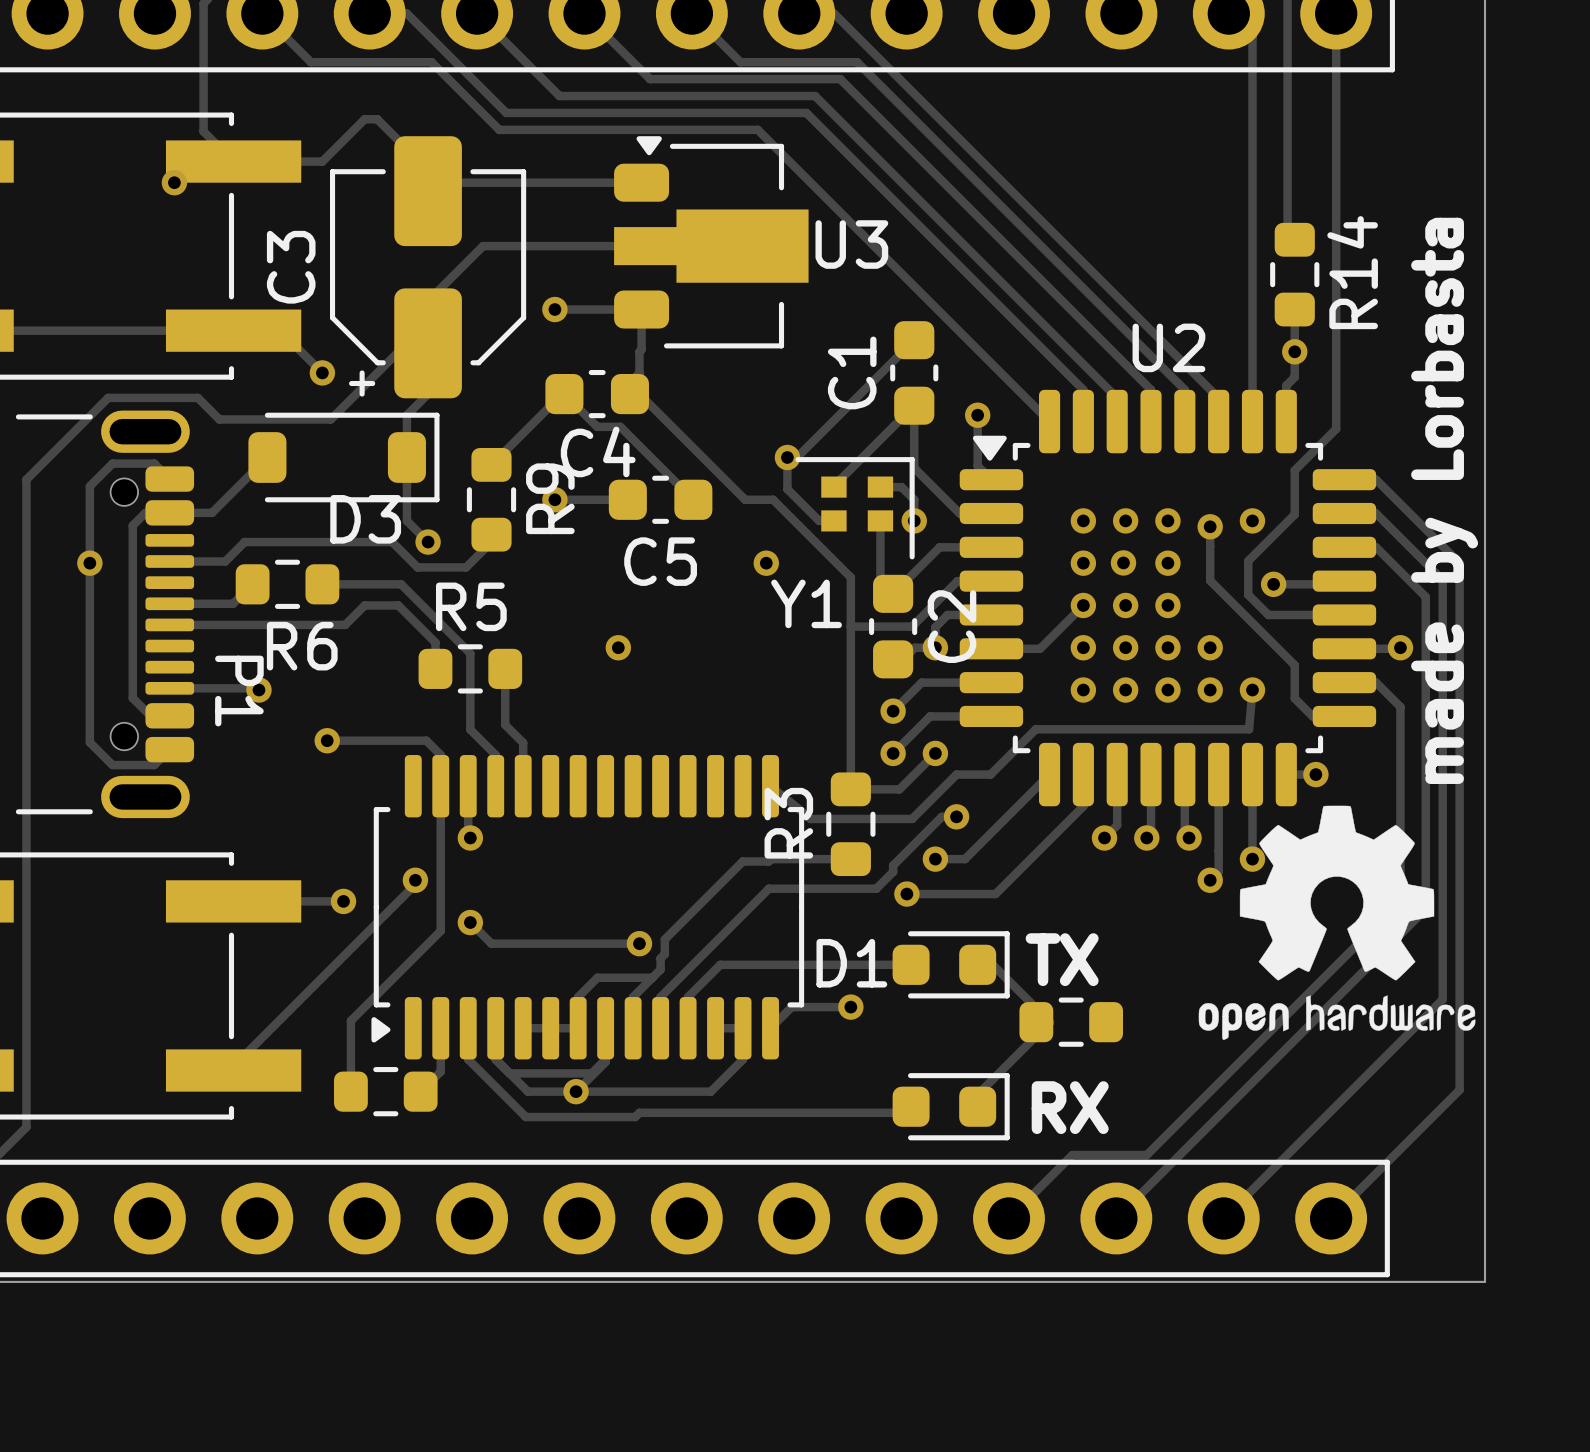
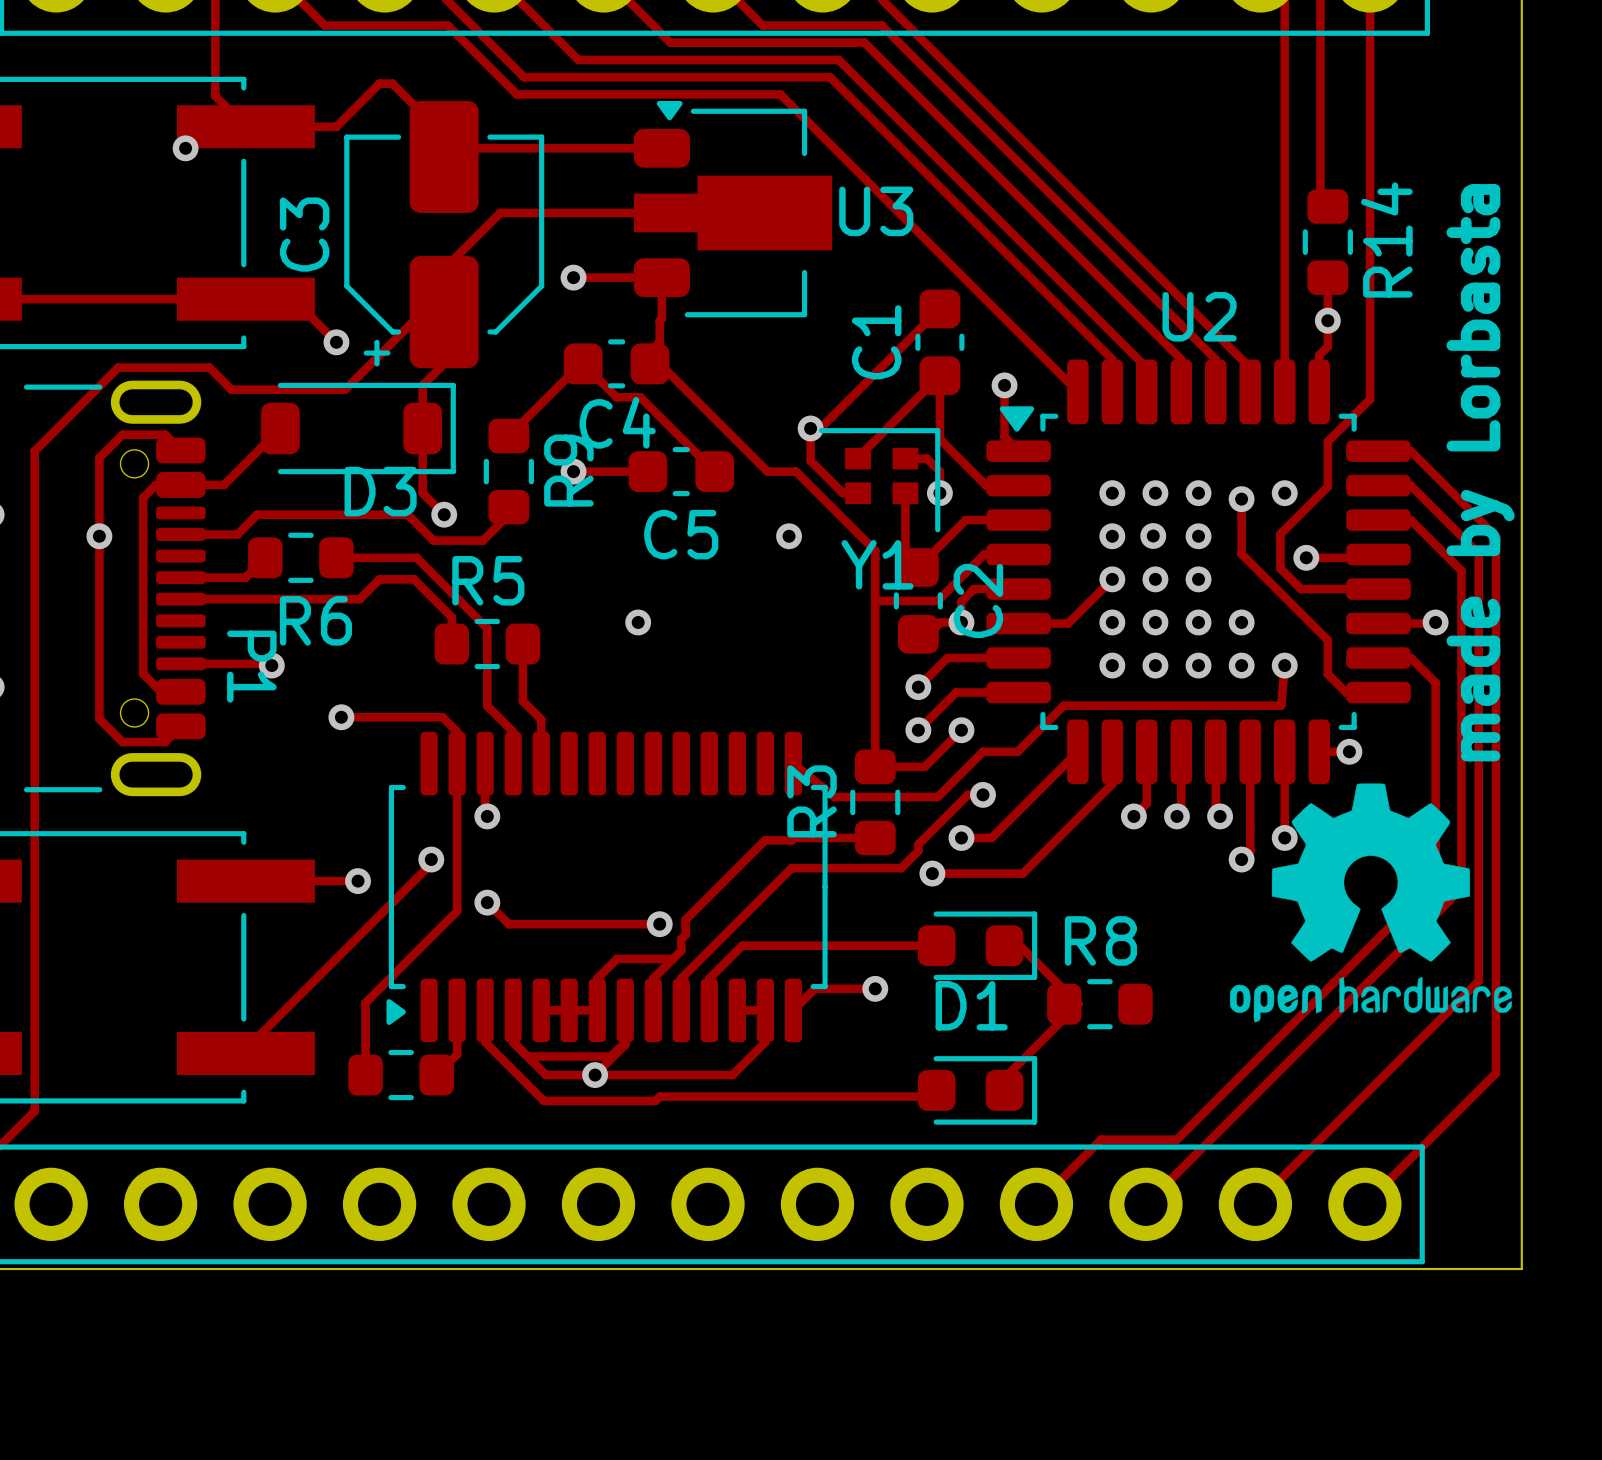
Y1 name position: Y1 (806, 603) -> Y1 (877, 564)
text: TX (1062, 959) -> none
R8 name: none -> R8 (1100, 940)
D1 name position: D1 (851, 963) -> D1 (971, 1005)
text: RX (1070, 1107) -> none

